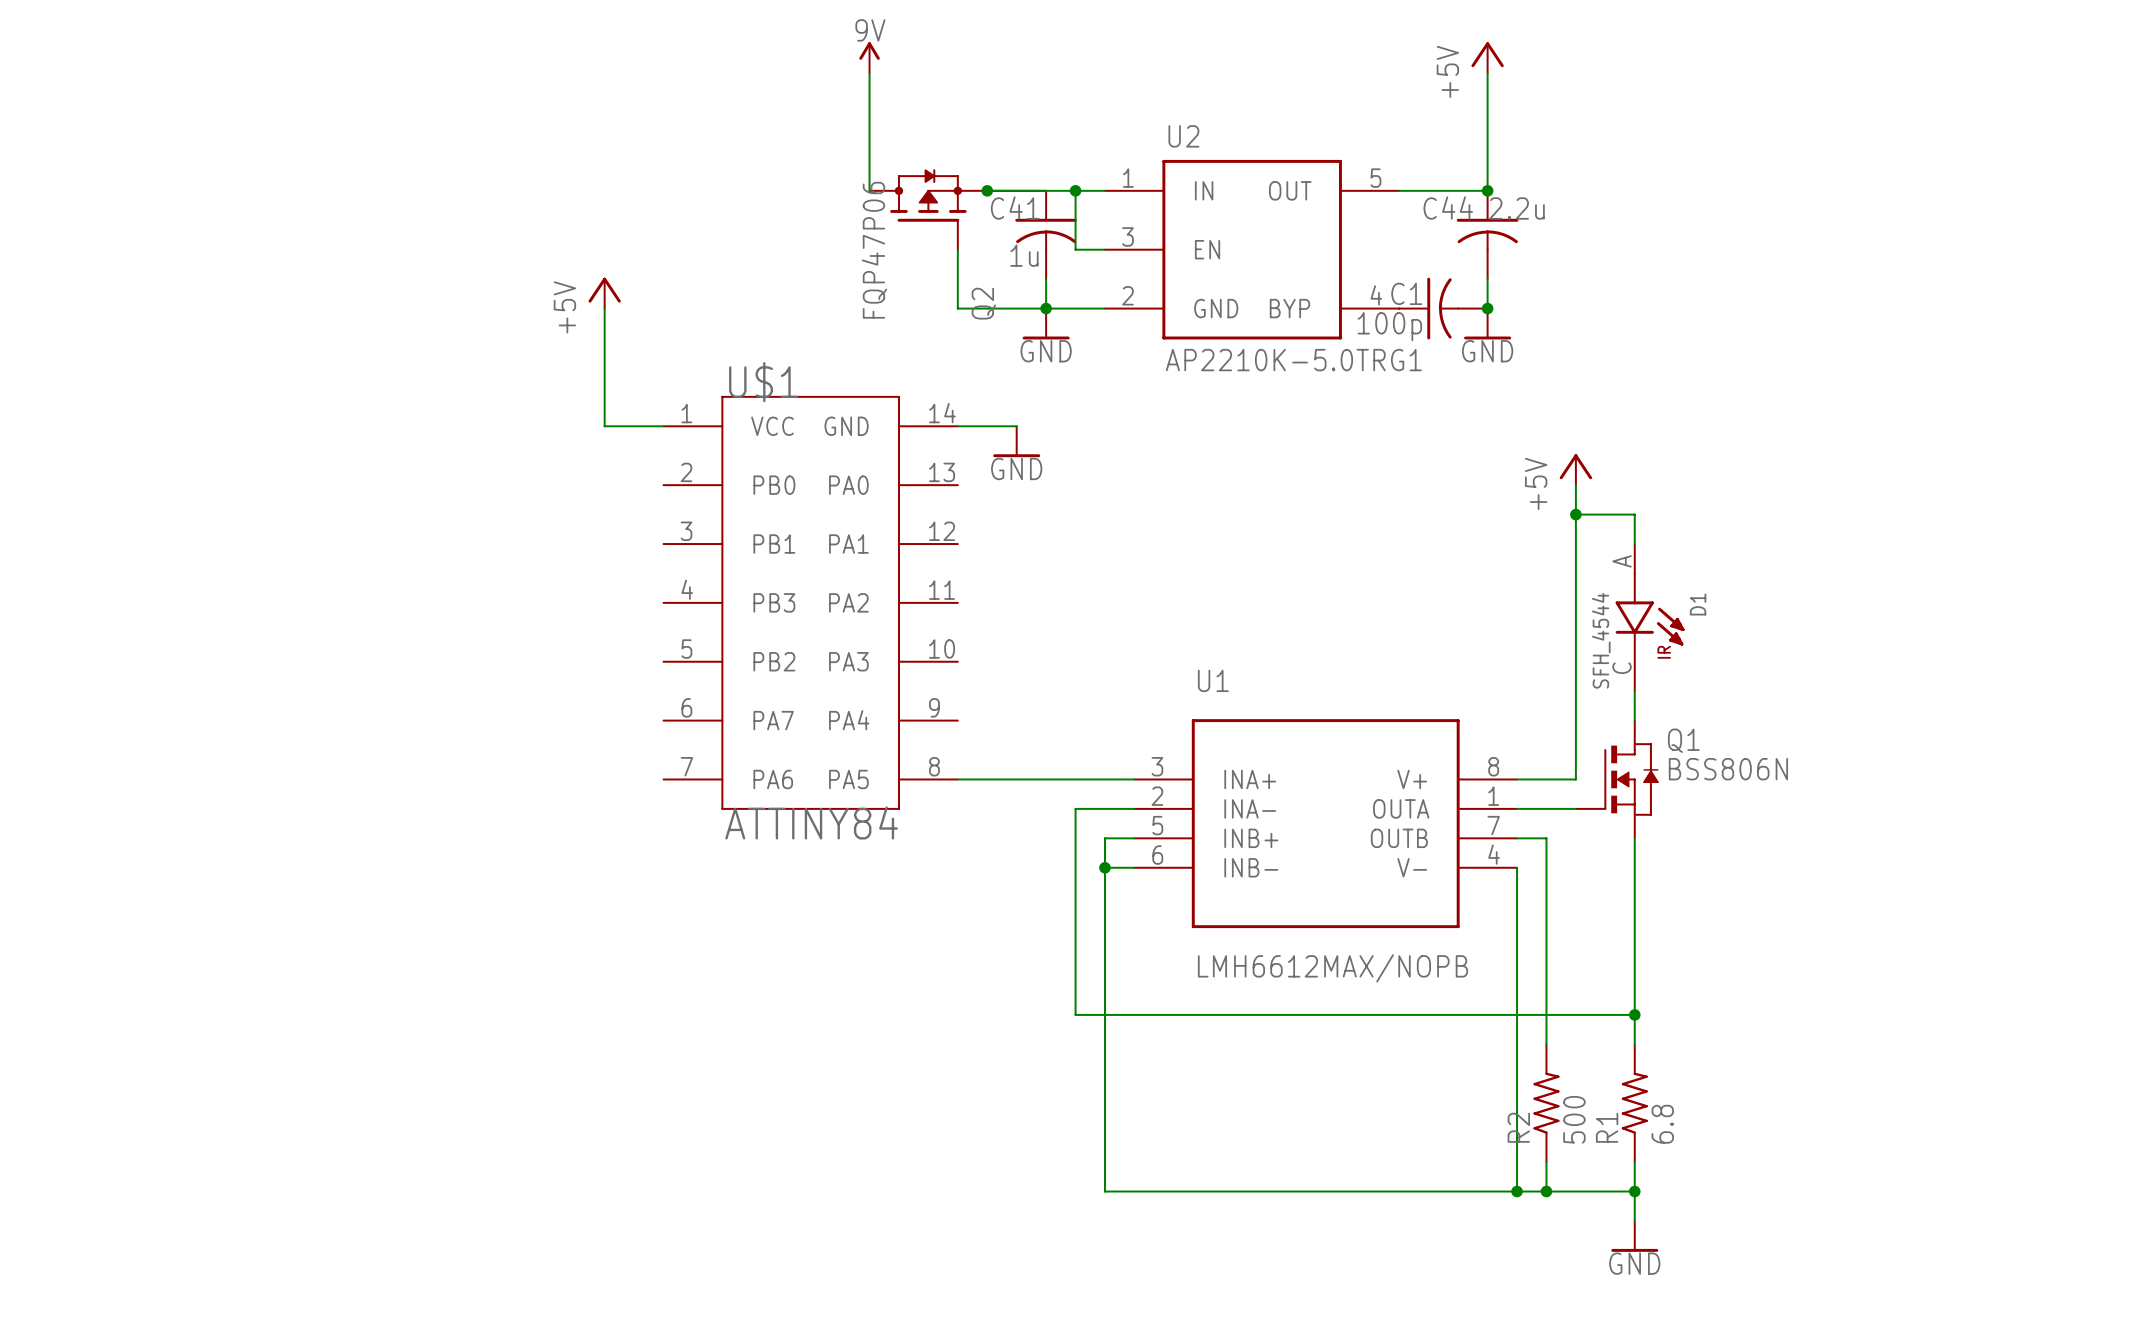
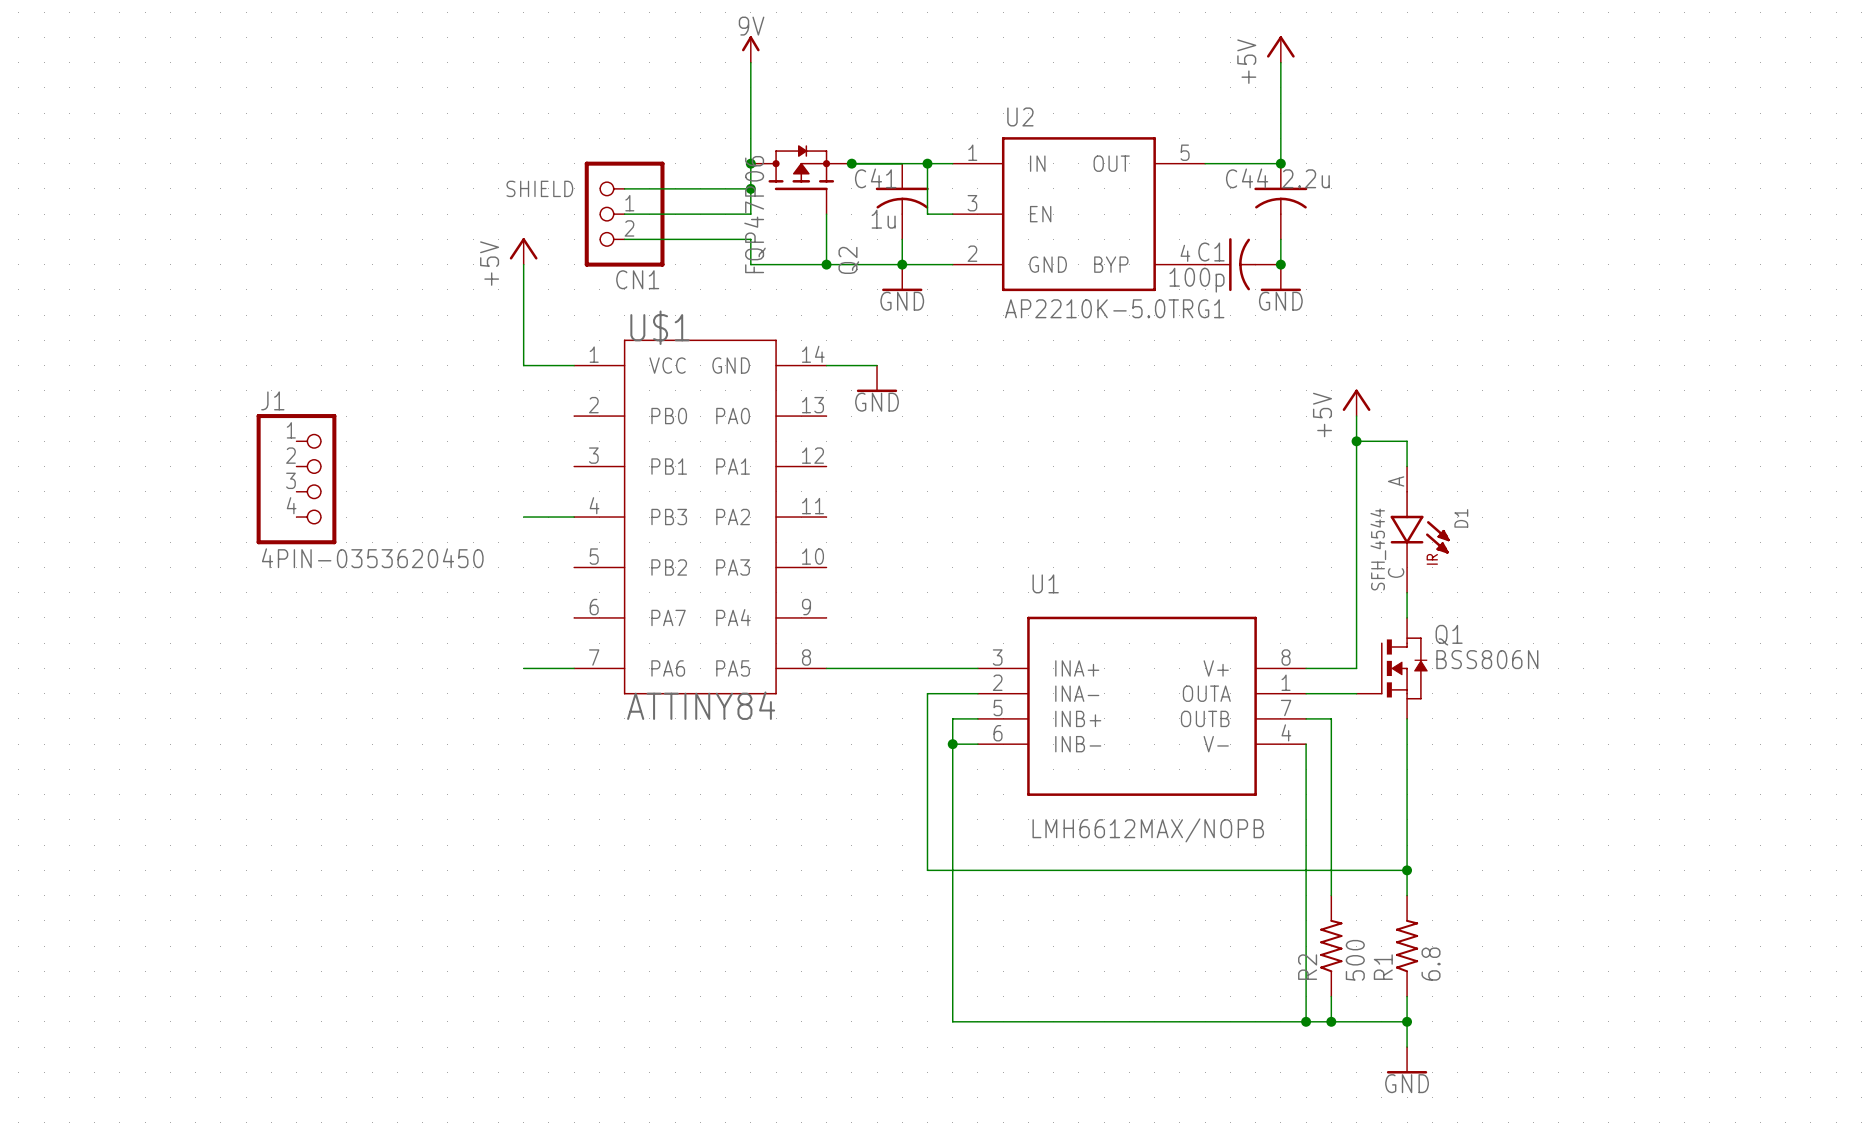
wire: none -> (750, 163) (750, 214) (624, 214)
junction: none -> (750, 163)
wire: none -> (624, 188) (750, 188)
junction: none -> (750, 188)
CN1: none -> (624, 214)
wire: none -> (624, 239) (750, 239) (750, 264) (826, 264)
junction: none -> (826, 264)
J1: none -> 4PIN-0353620450 (296, 479)
wire: none -> (523, 517) (574, 517)
wire: none -> (523, 668) (574, 668)

